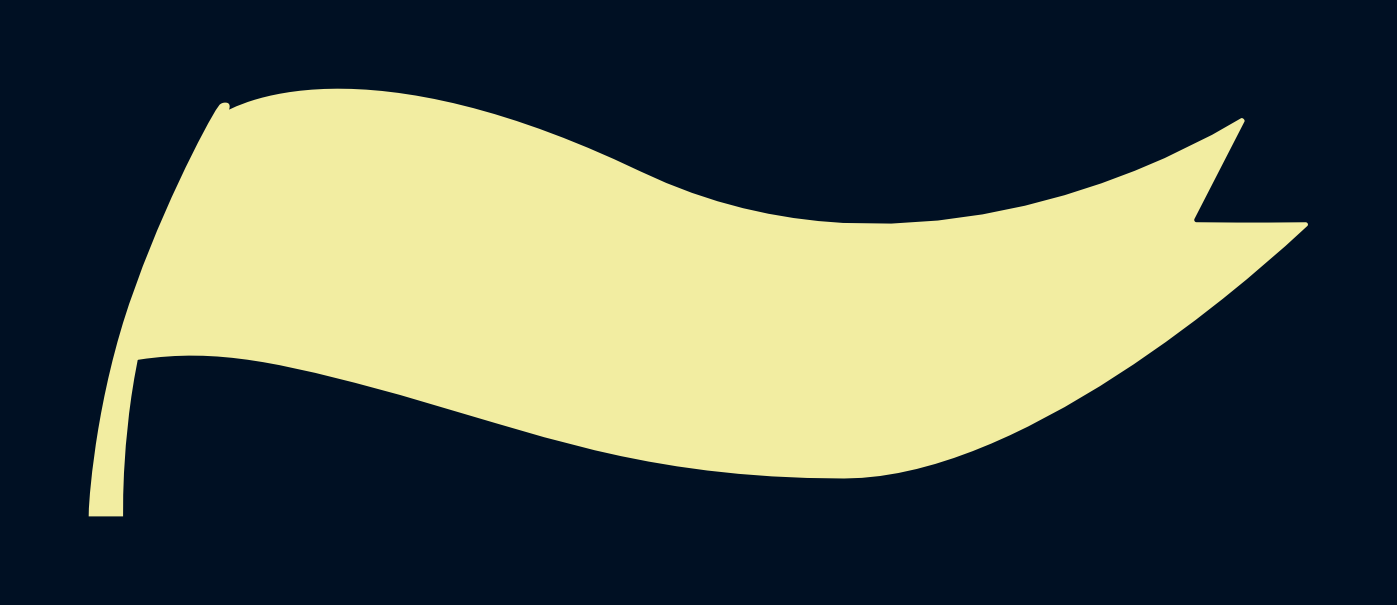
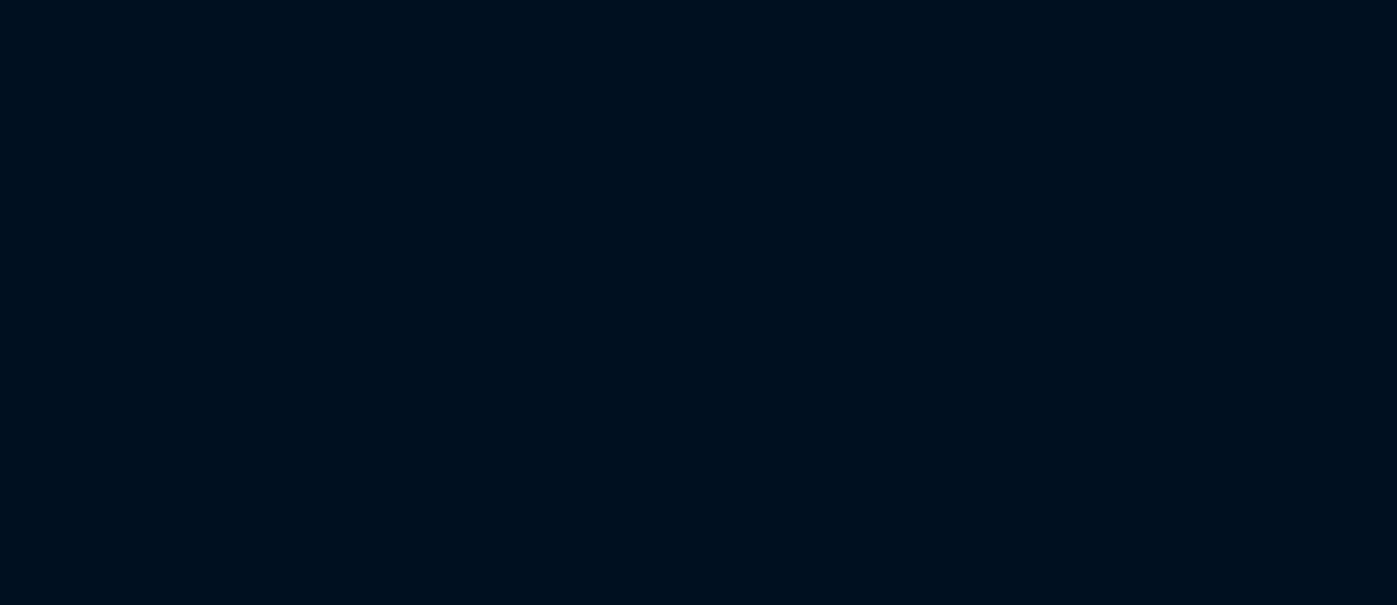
drawing: [88, 88, 1308, 517] -> none

